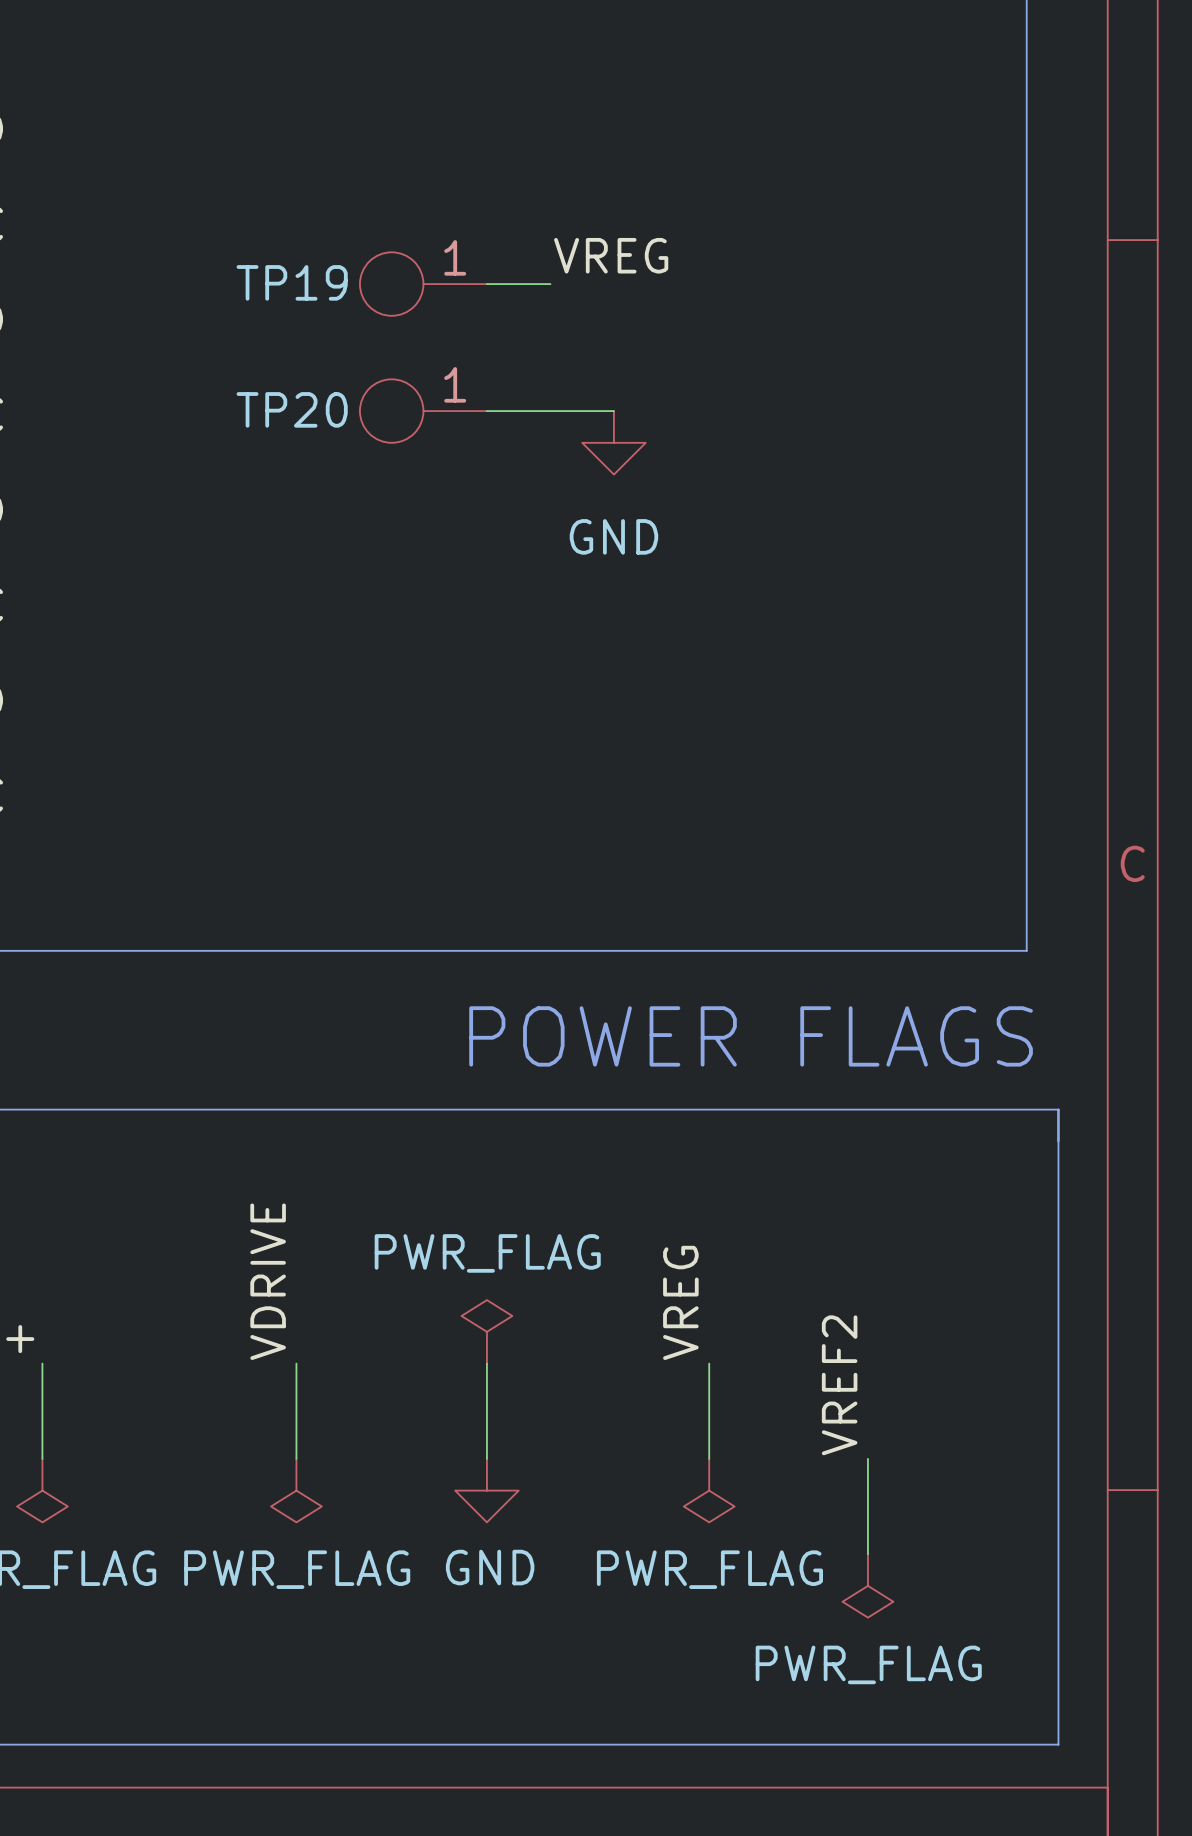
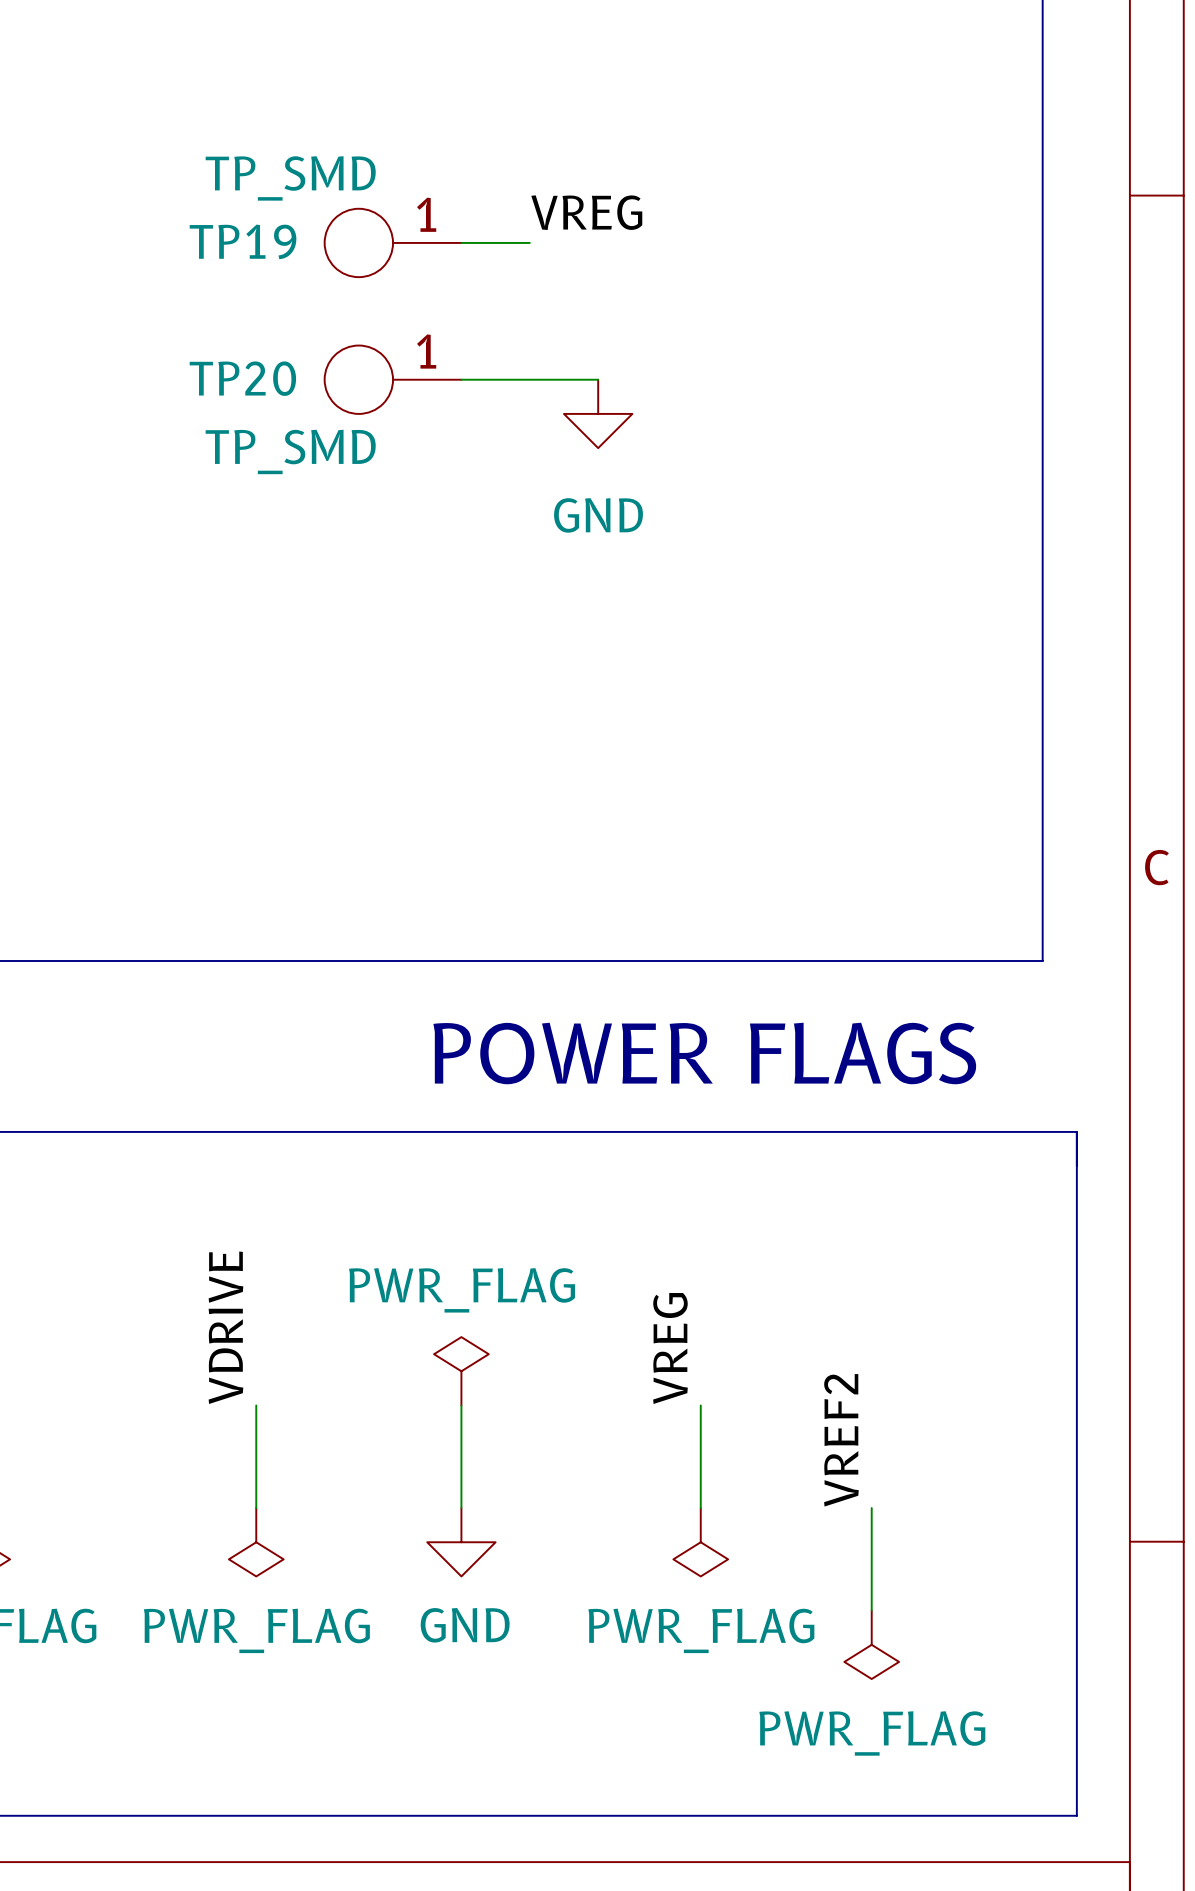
TP19 value: none -> TP_SMD (290, 178)
TP20 value: none -> TP_SMD (290, 451)

